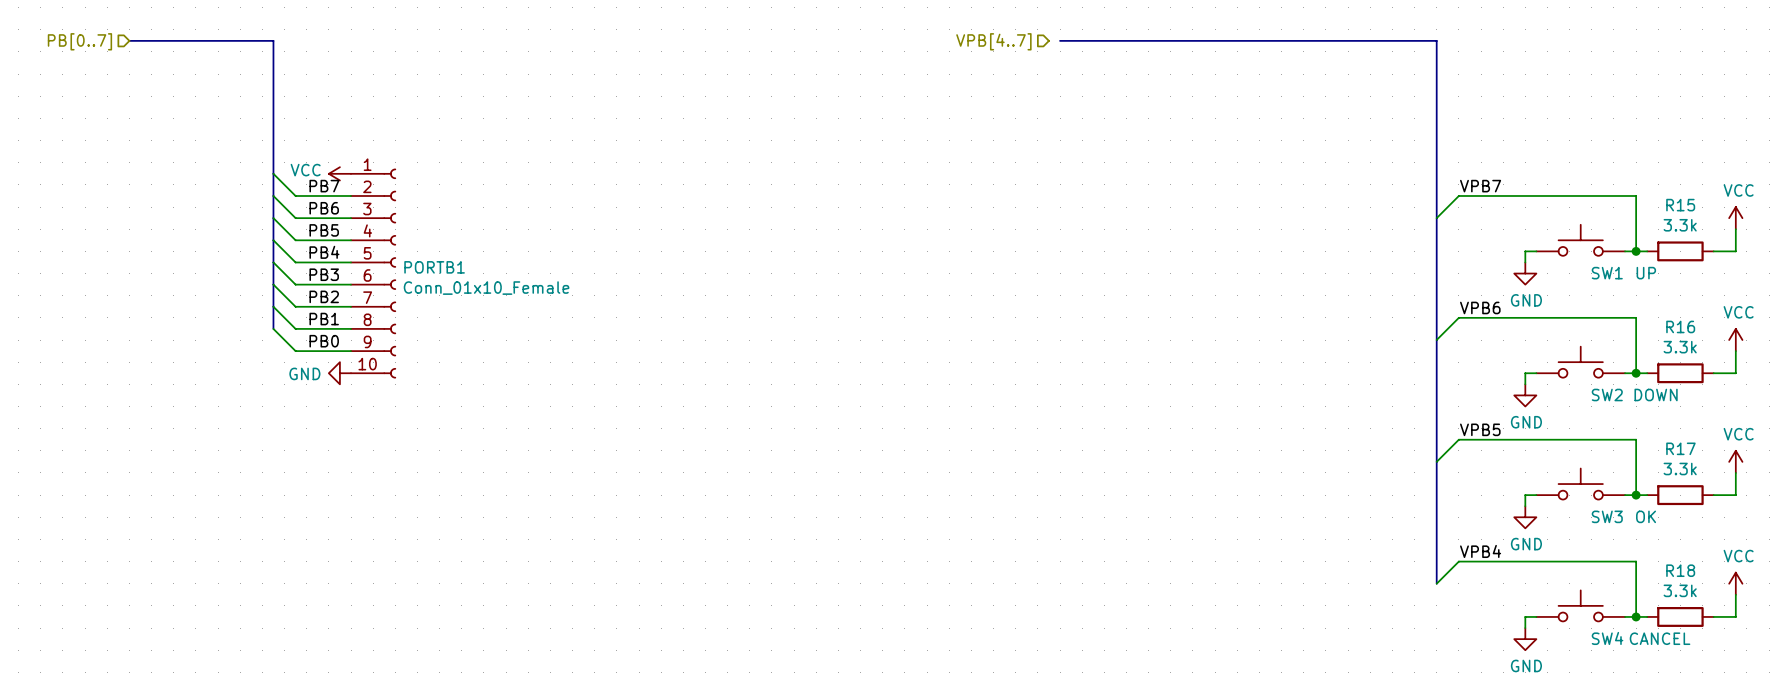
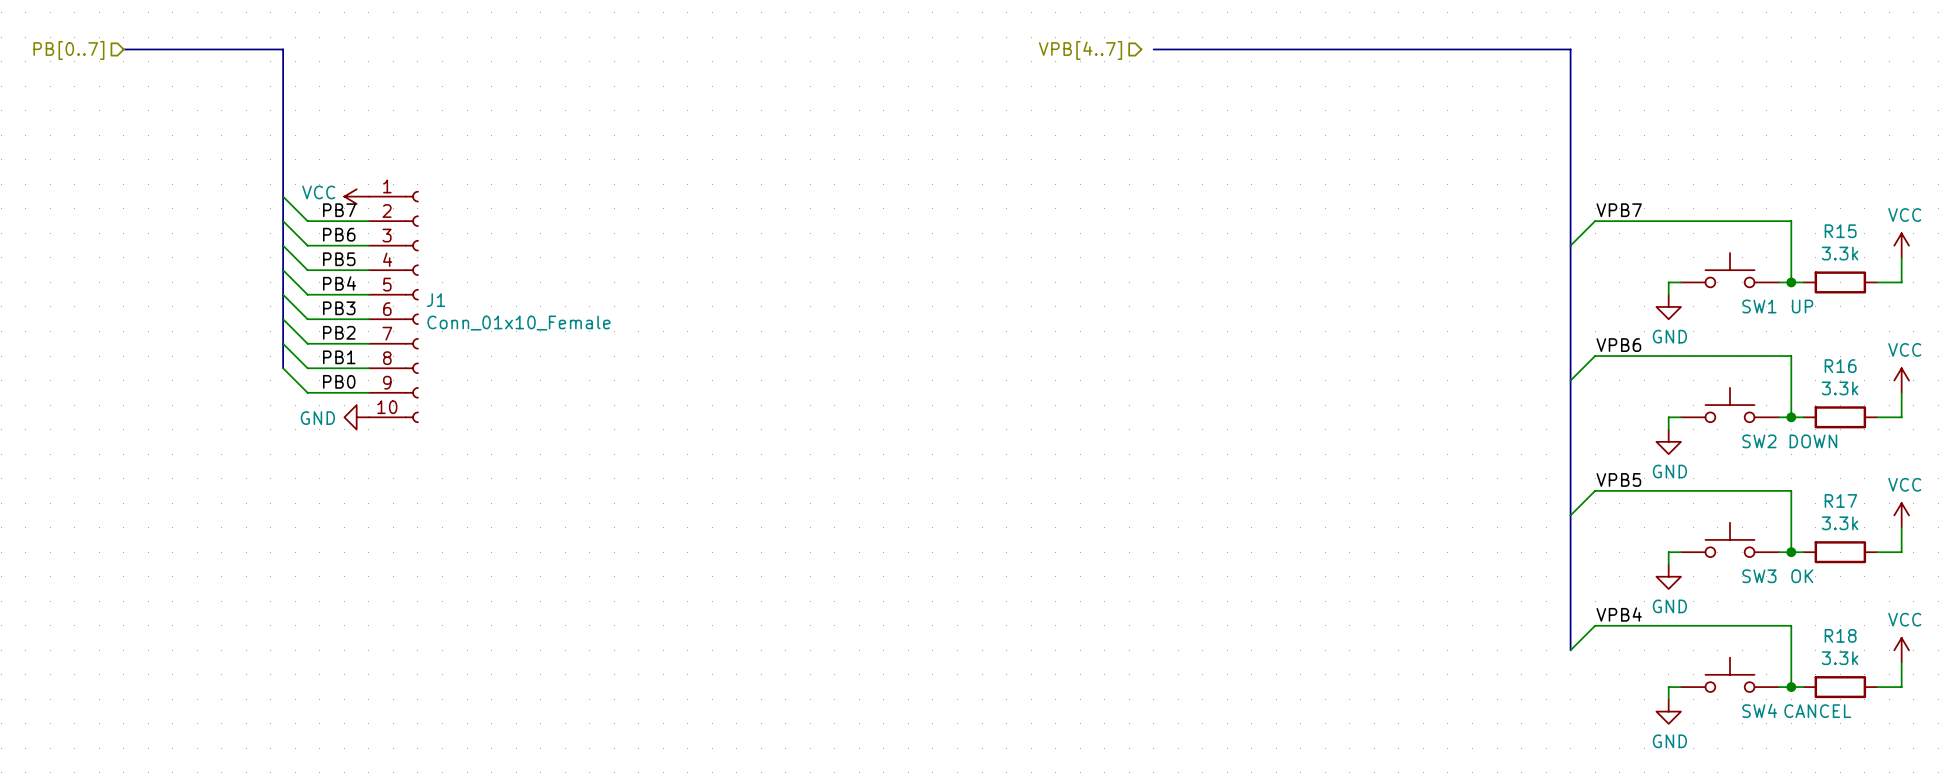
PORTB1 name: PORTB1 (434, 267) -> J1 (436, 300)

